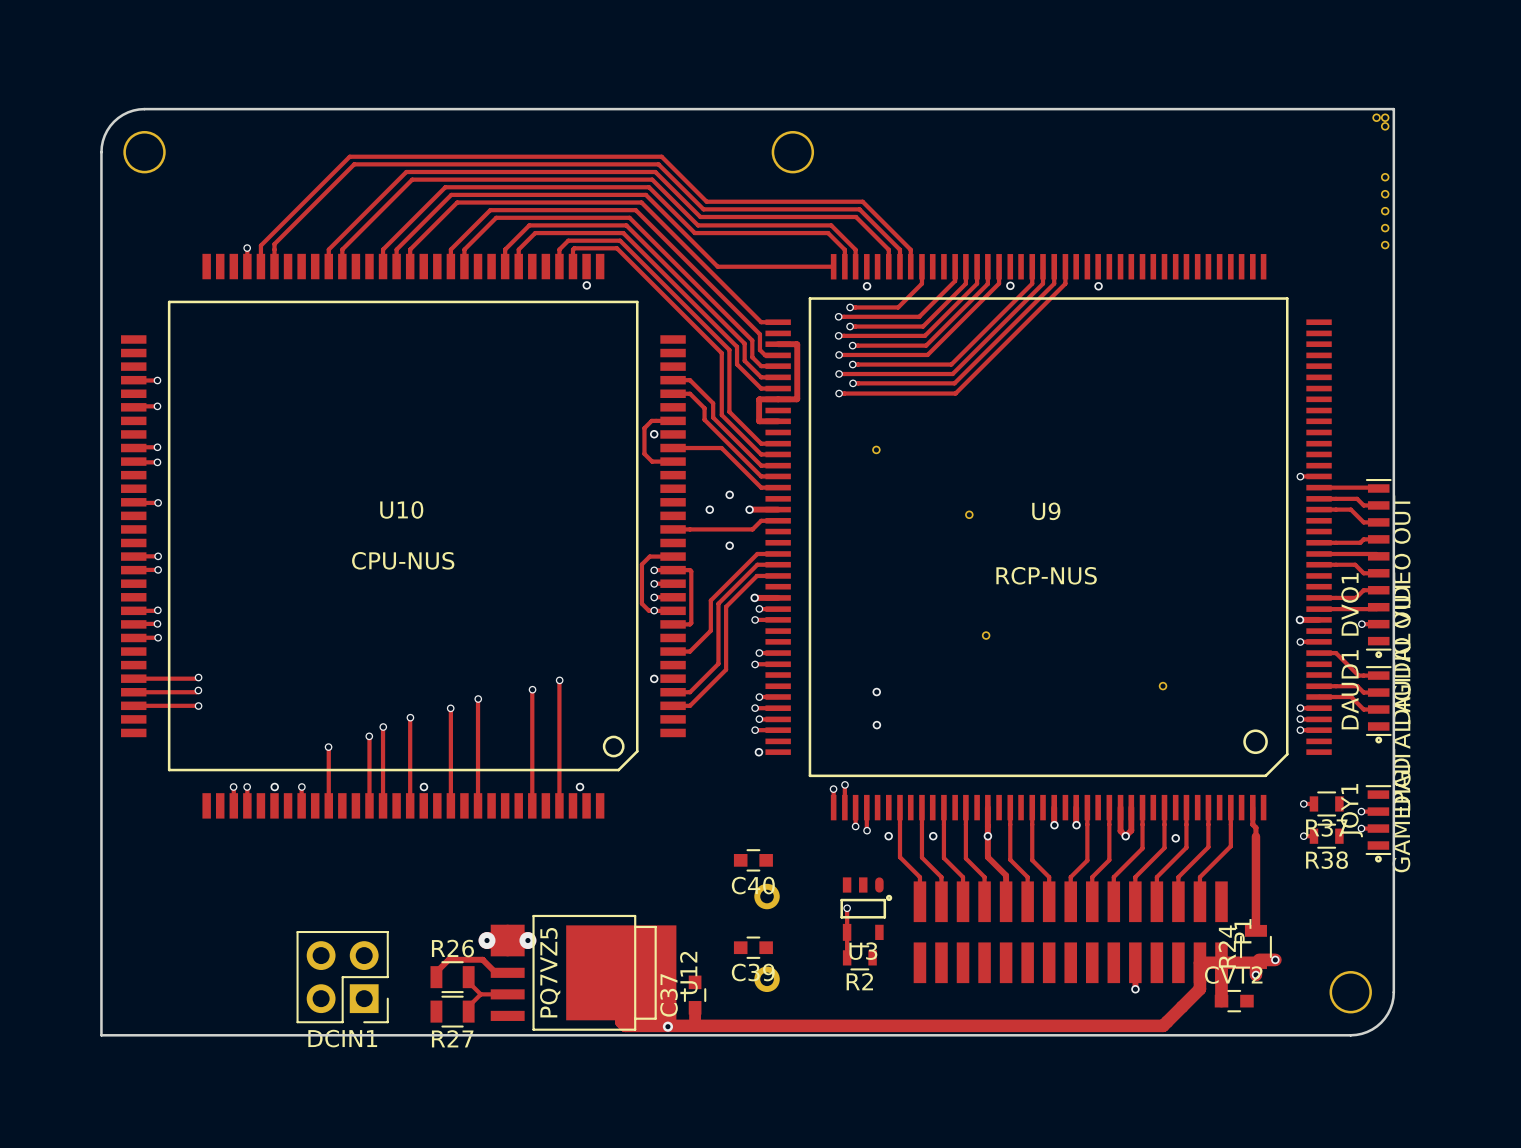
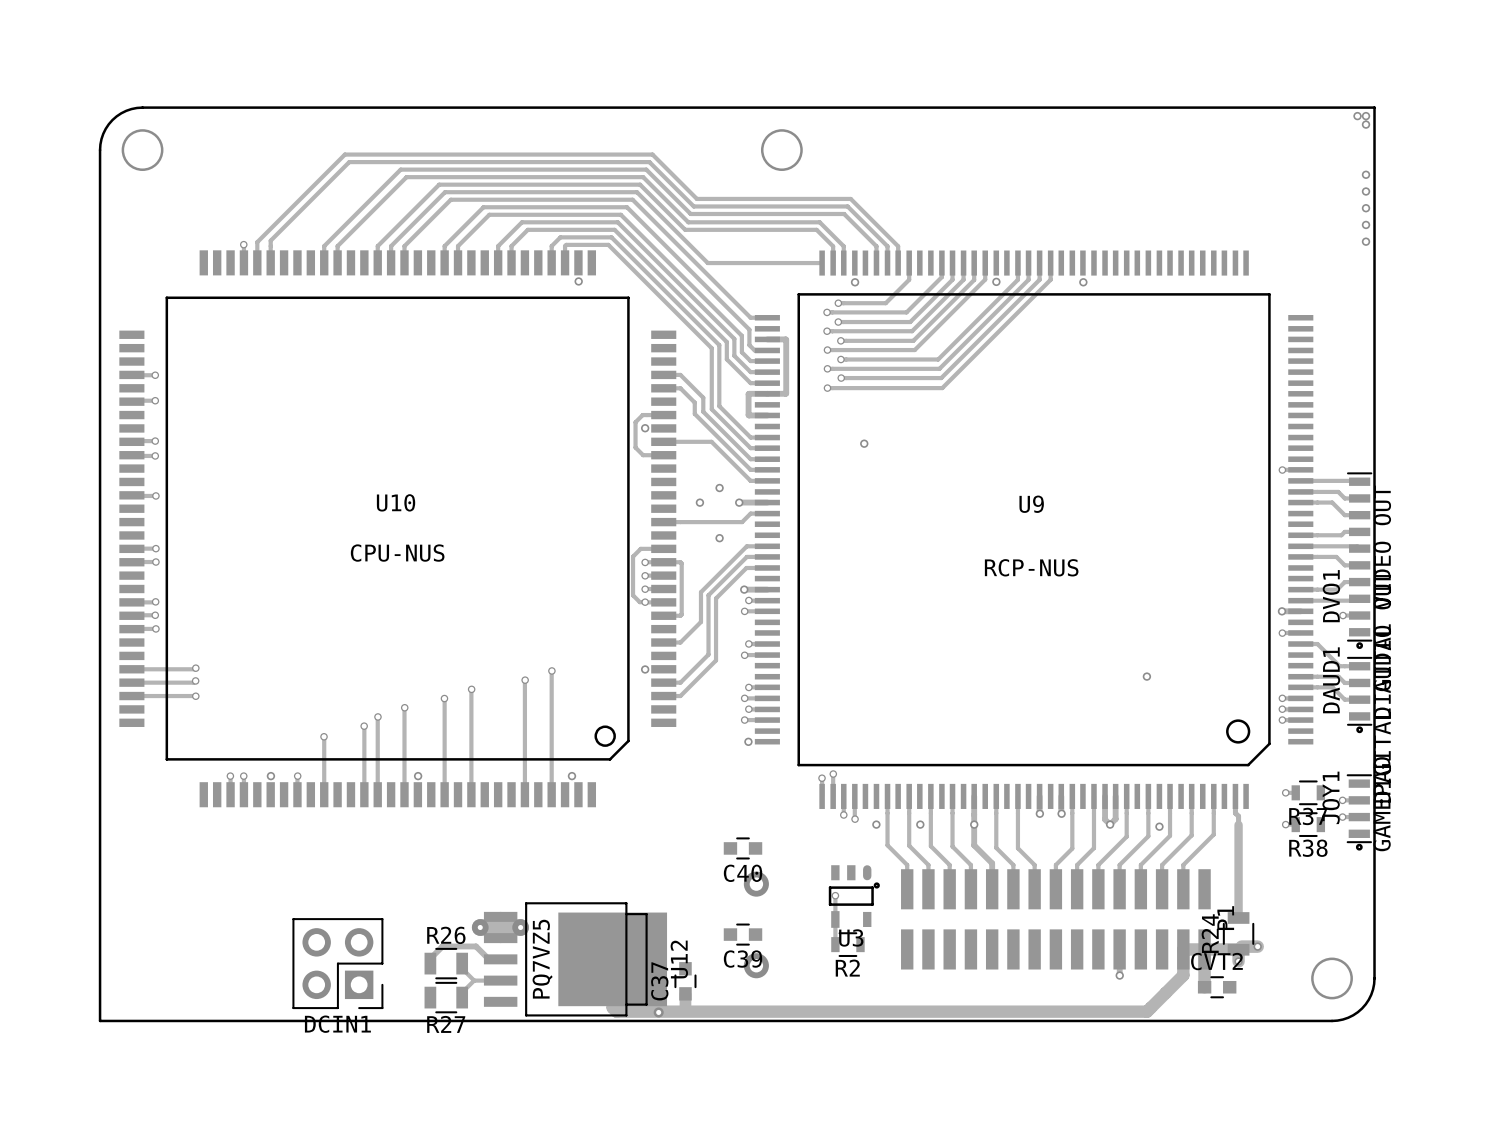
part: (969, 514) -> none
part: (986, 635) -> none
via: (876, 692) -> none
via: (876, 725) -> none

